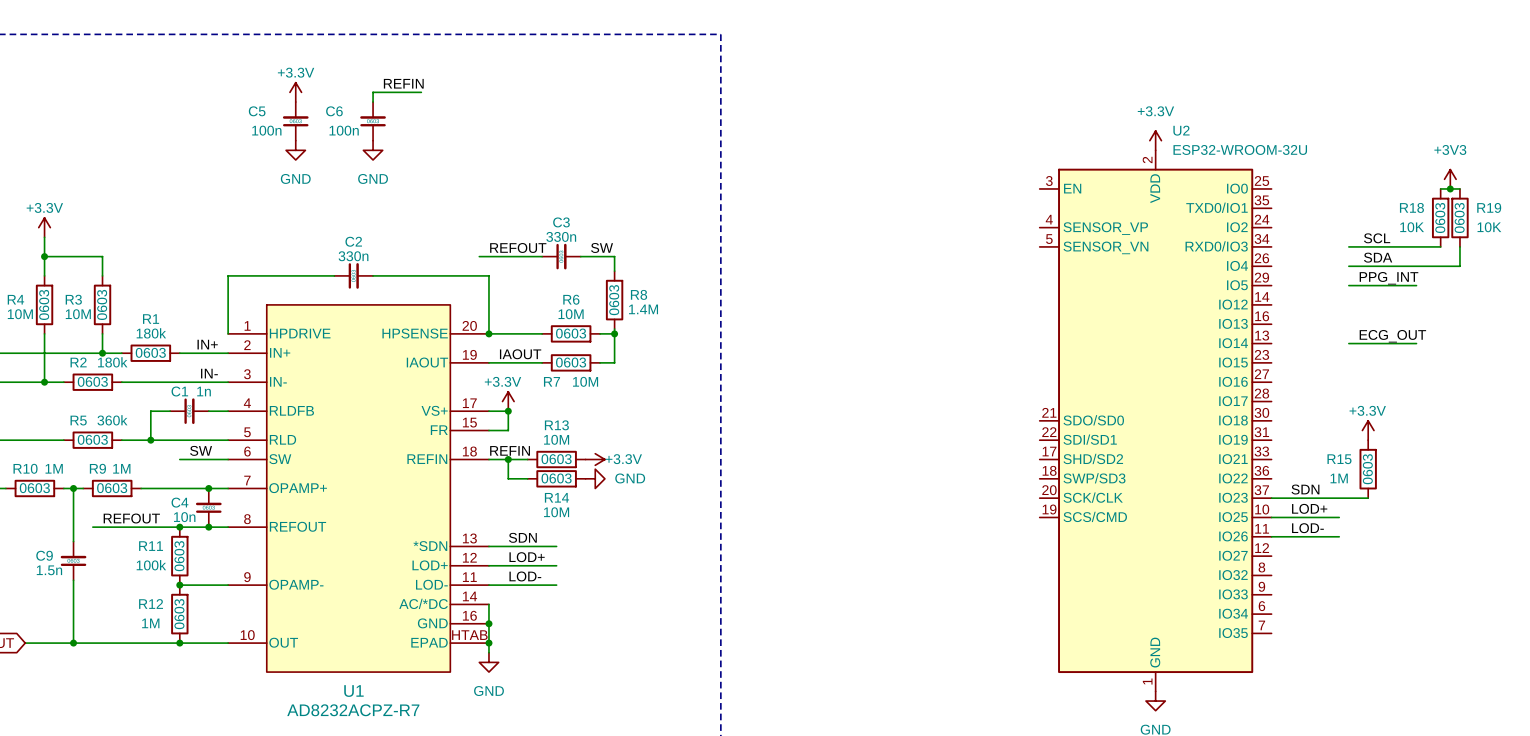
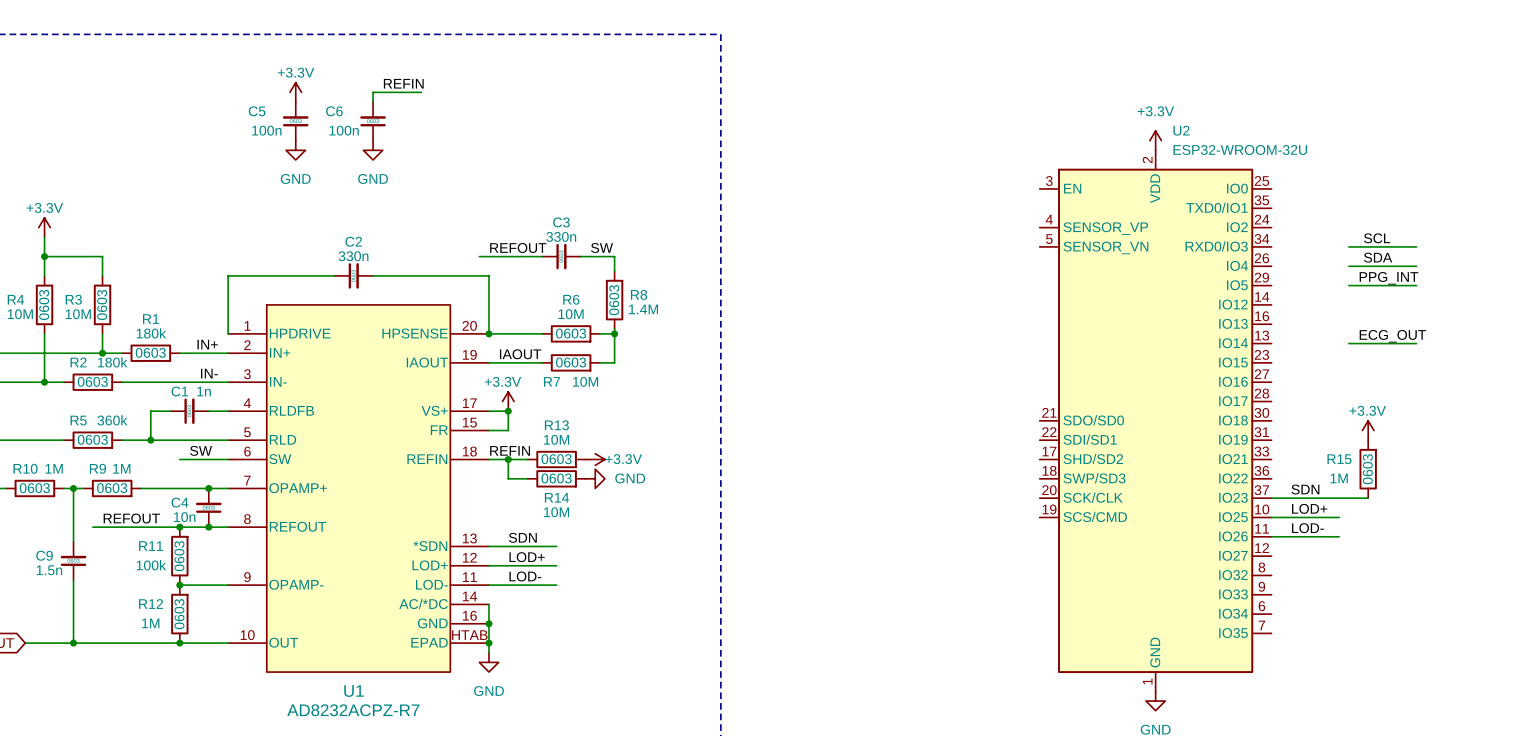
power symbol: +3V3 (1450, 179) -> none
wire: (1440, 188) (1459, 188) -> none
junction: (1450, 188) -> none
R18: 10K (1440, 217) -> none
R19: 10K (1459, 217) -> none
wire: (1416, 246) (1440, 246) -> none
wire: (1459, 246) (1459, 266) (1416, 266) -> none

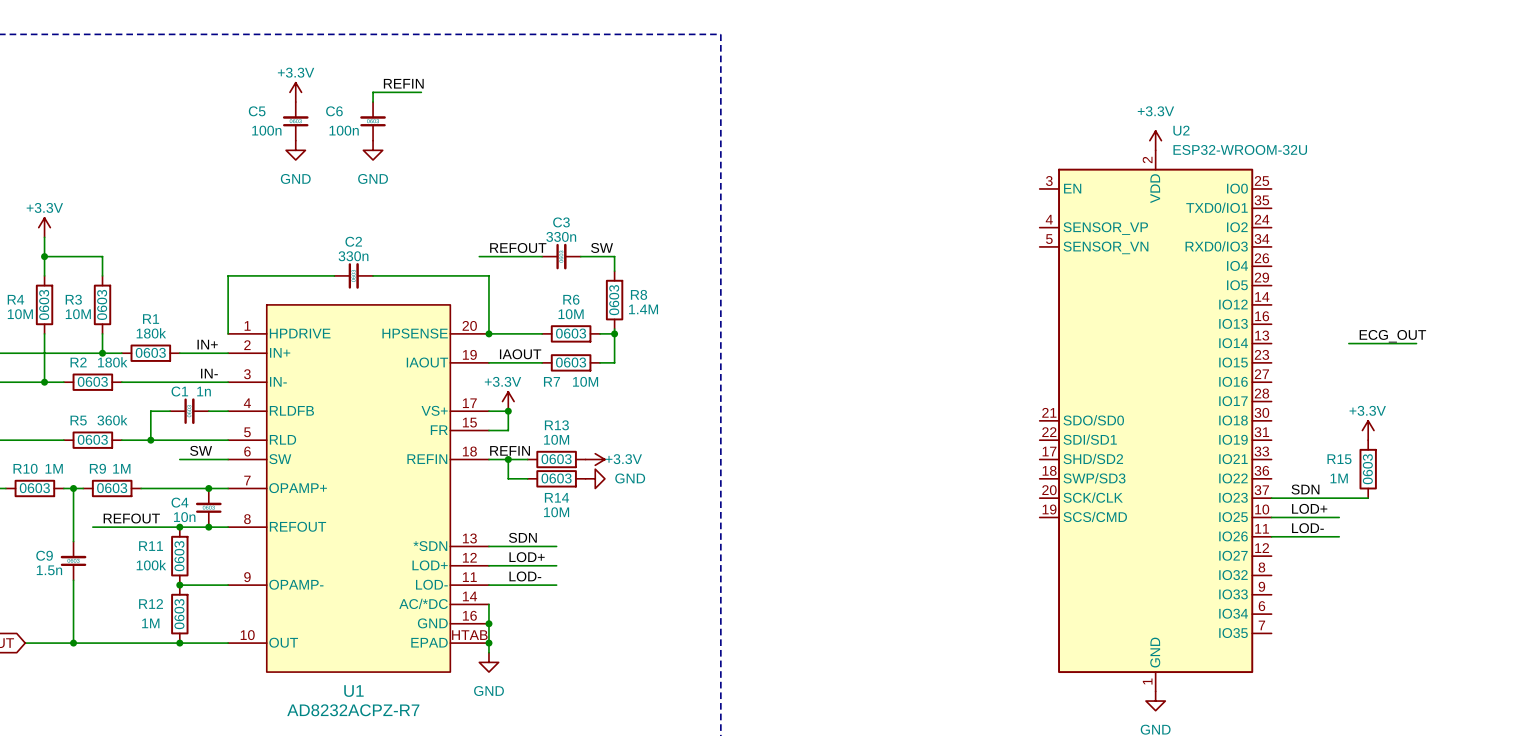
label: SCL (1377, 238) -> none
wire: (1348, 246) (1416, 246) -> none
label: SDA (1378, 257) -> none
wire: (1348, 266) (1416, 266) -> none
label: PPG_INT (1388, 278) -> none
wire: (1348, 285) (1416, 285) -> none

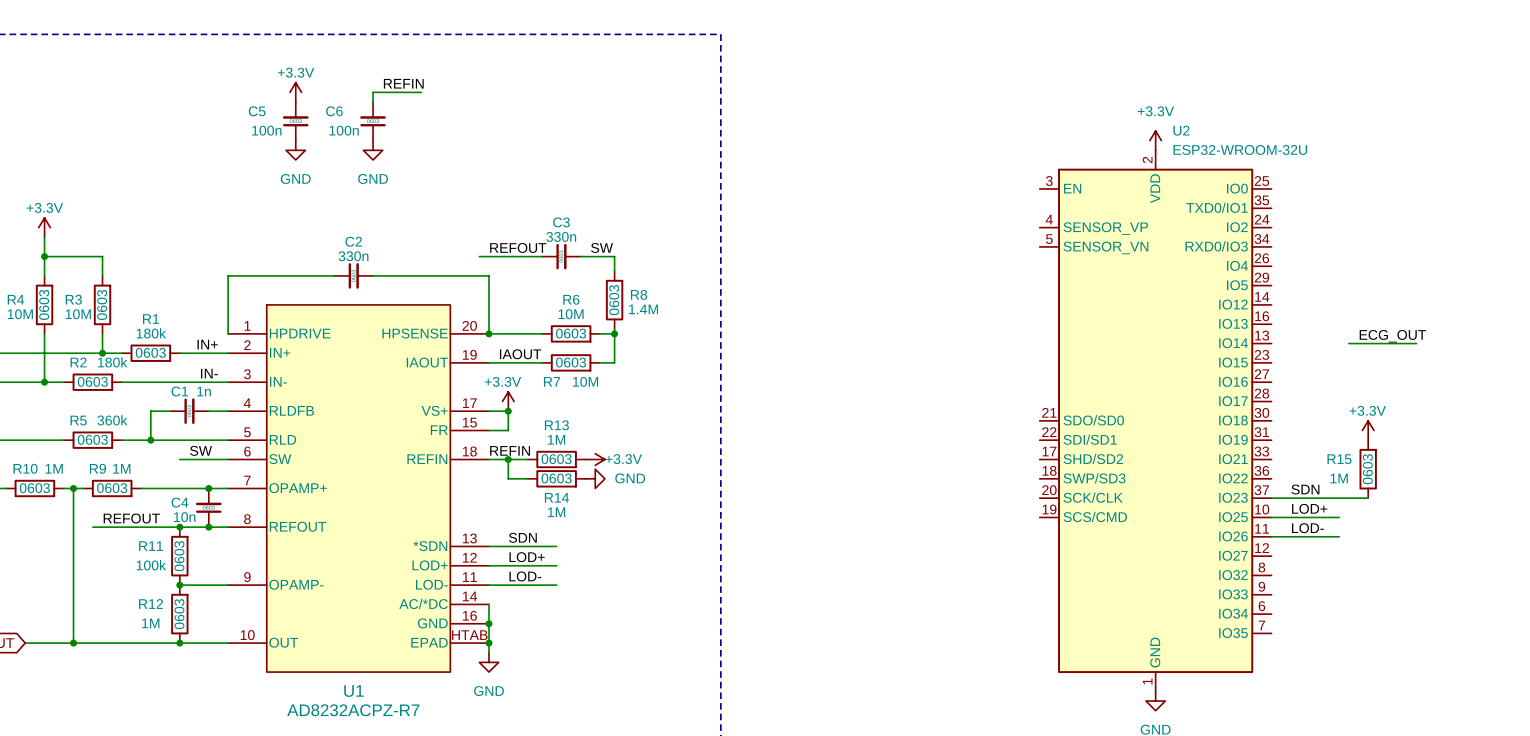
R13 value: 10M (556, 439) -> 1M (556, 439)
R14 value: 10M (556, 512) -> 1M (556, 512)
C9: 1.5n (73, 560) -> none

